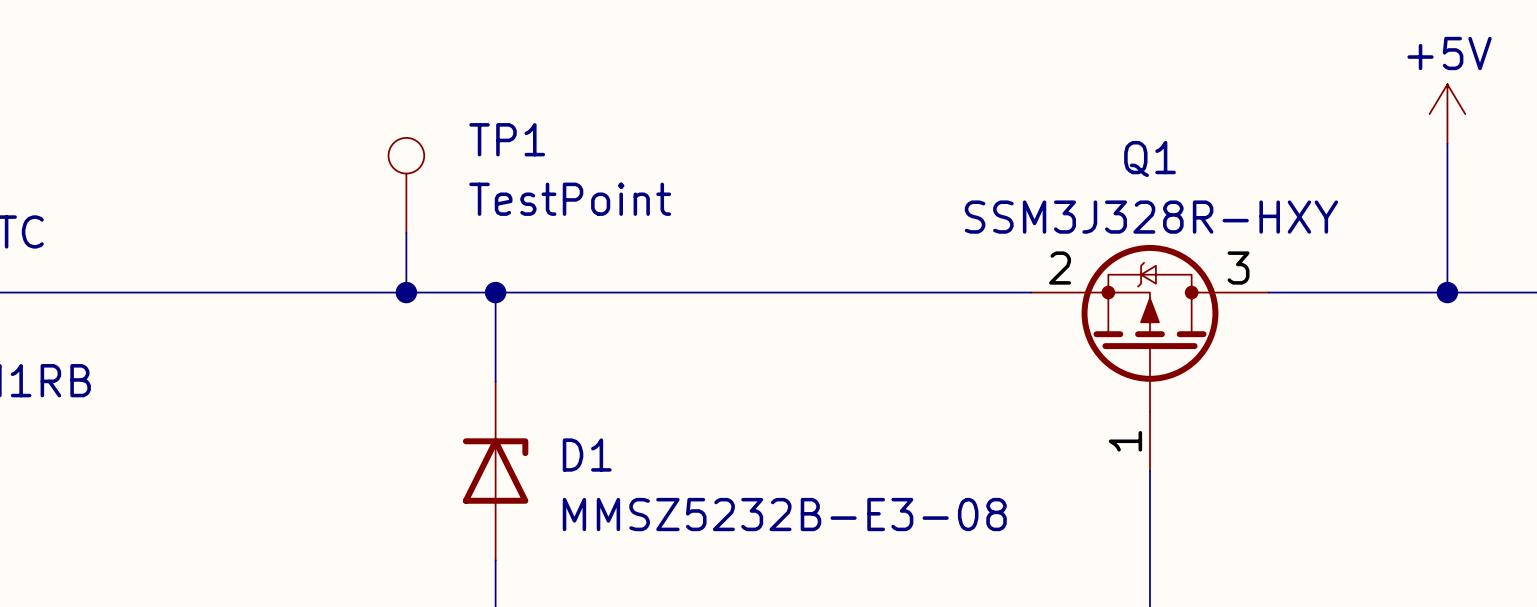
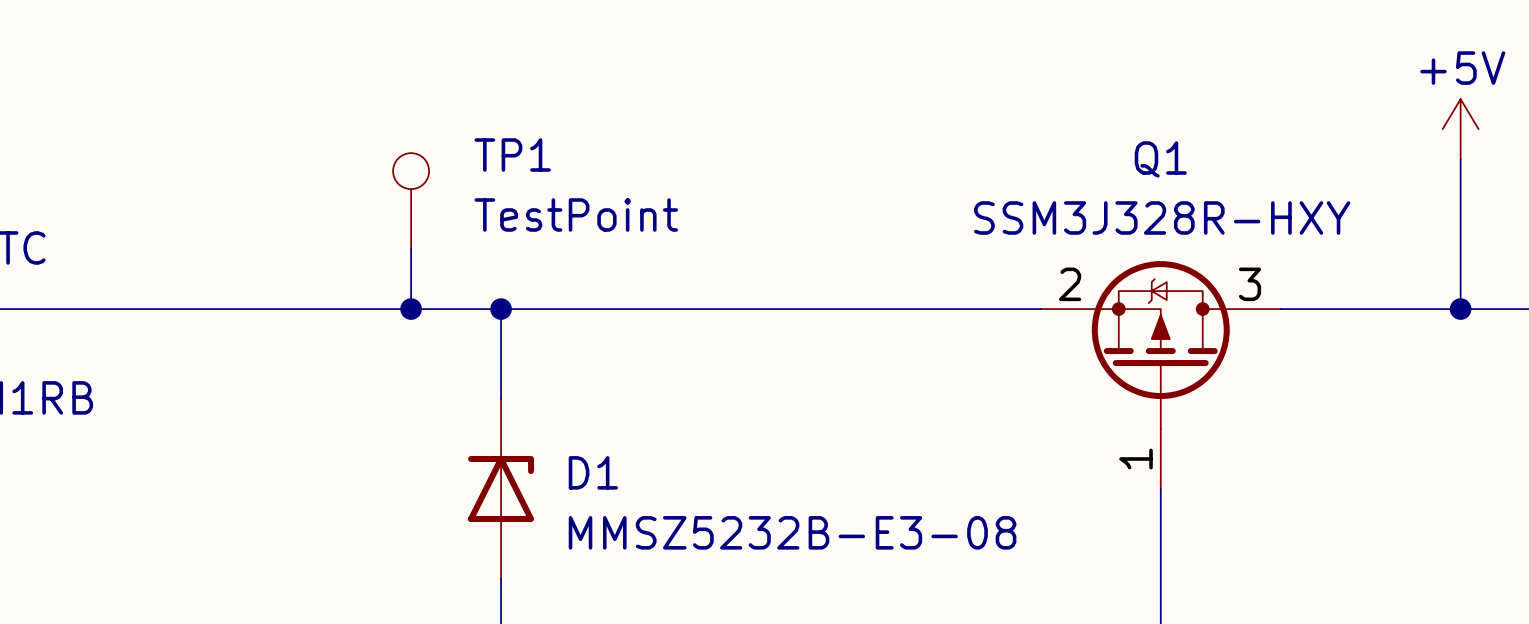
Q1 name position: Q1 (1149, 159) -> Q1 (1160, 159)
Q1 value position: SSM3J328R-HXY (1151, 217) -> SSM3J328R-HXY (1162, 217)

